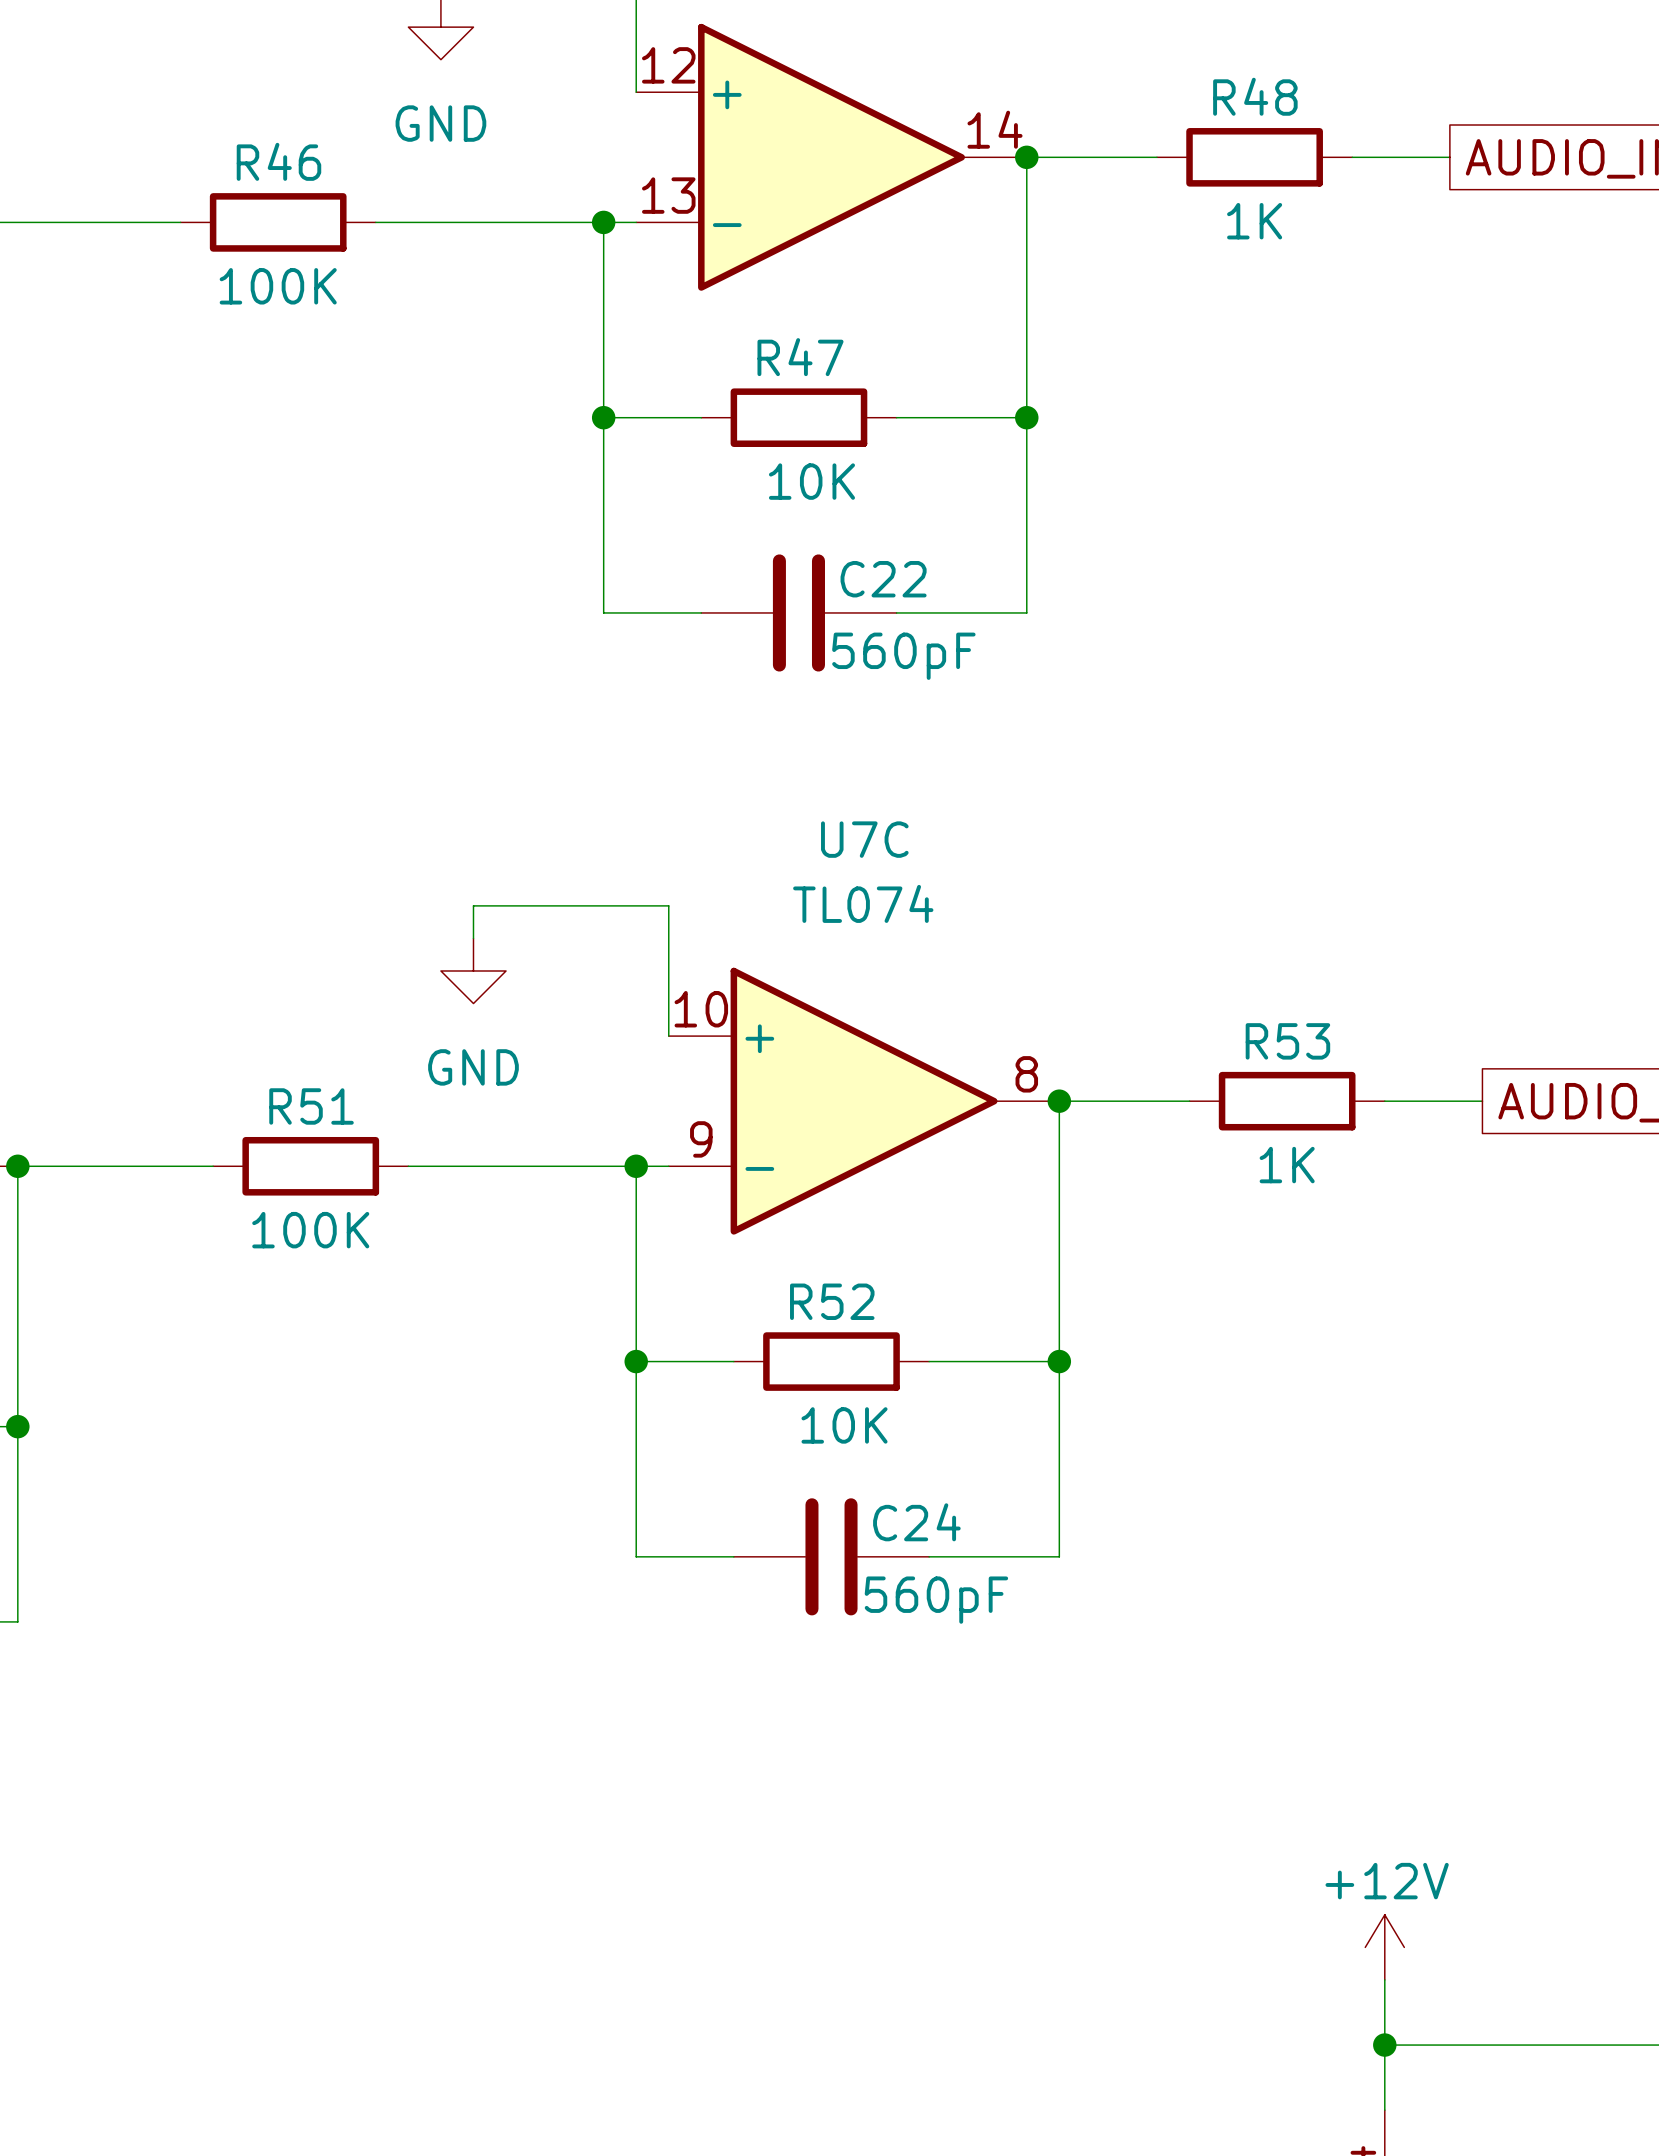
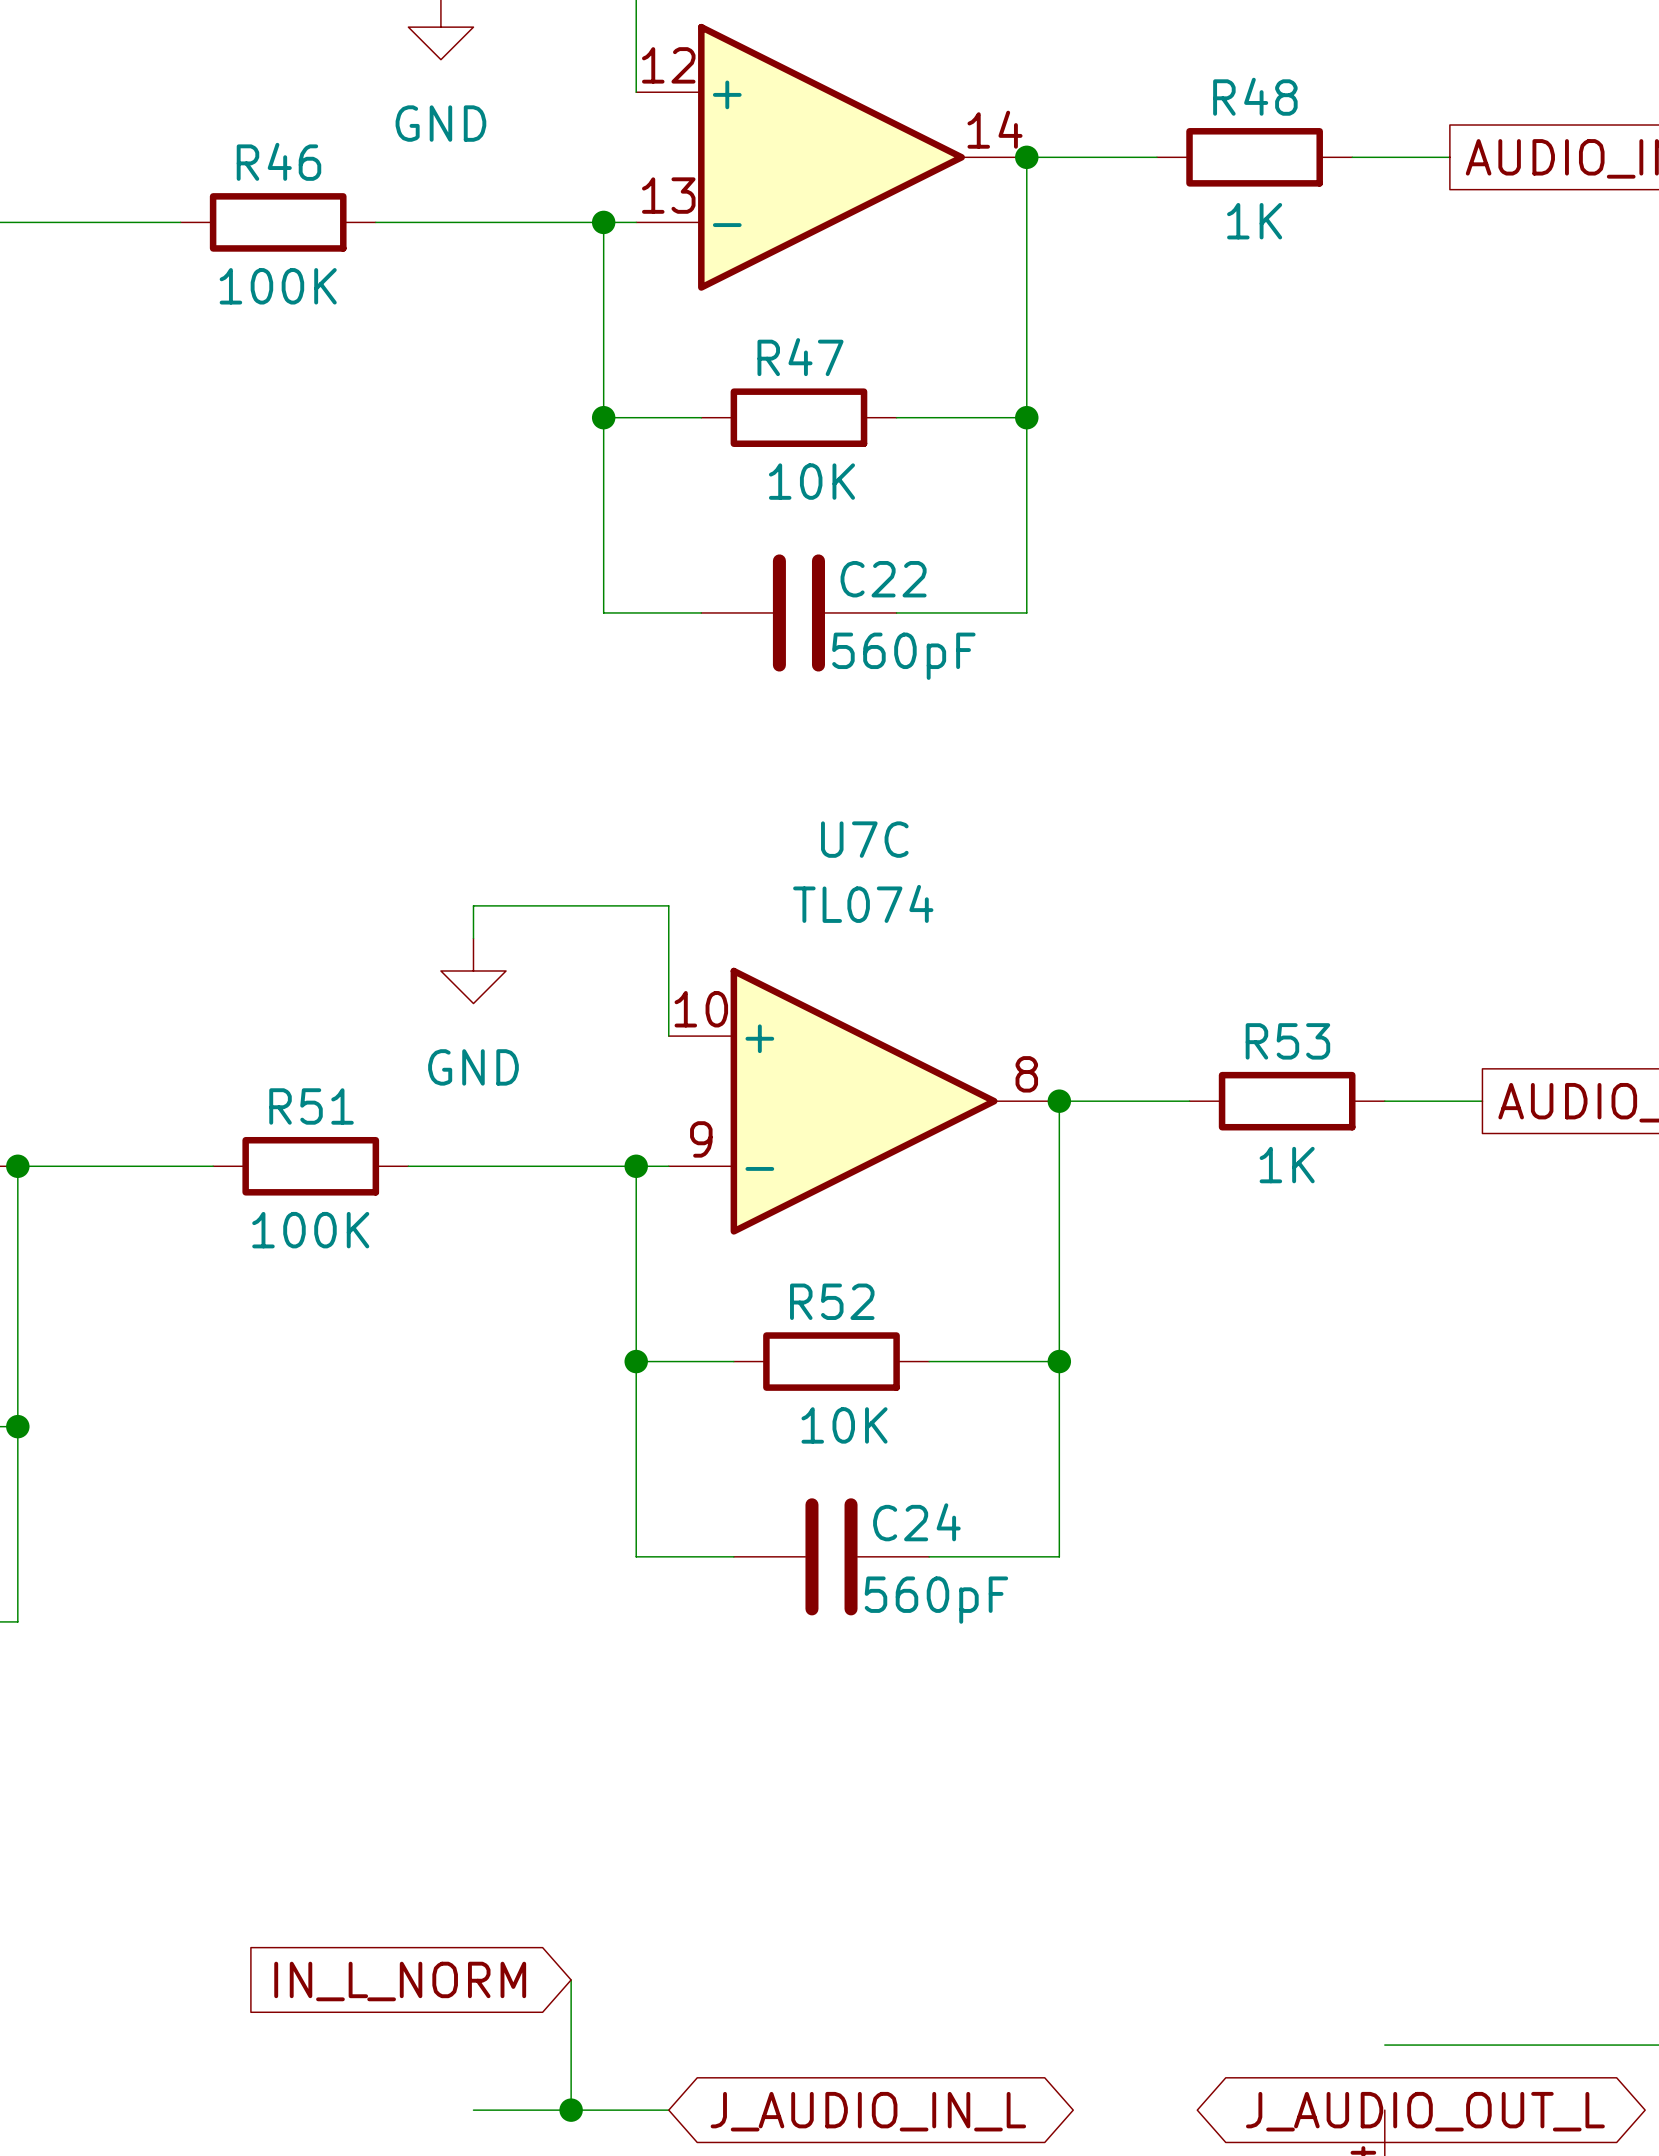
power symbol: +12V (1384, 1947) -> none
wire: none -> (571, 1979) (571, 2110)
wire: (1384, 1979) (1384, 2110) -> none
global label: none -> IN_L_NORM (400, 1981)
junction: (1384, 2045) -> none
wire: none -> (473, 2110) (668, 2110)
junction: none -> (571, 2110)
global label: none -> J_AUDIO_IN_L (868, 2111)
global label: none -> J_AUDIO_OUT_L (1425, 2111)

